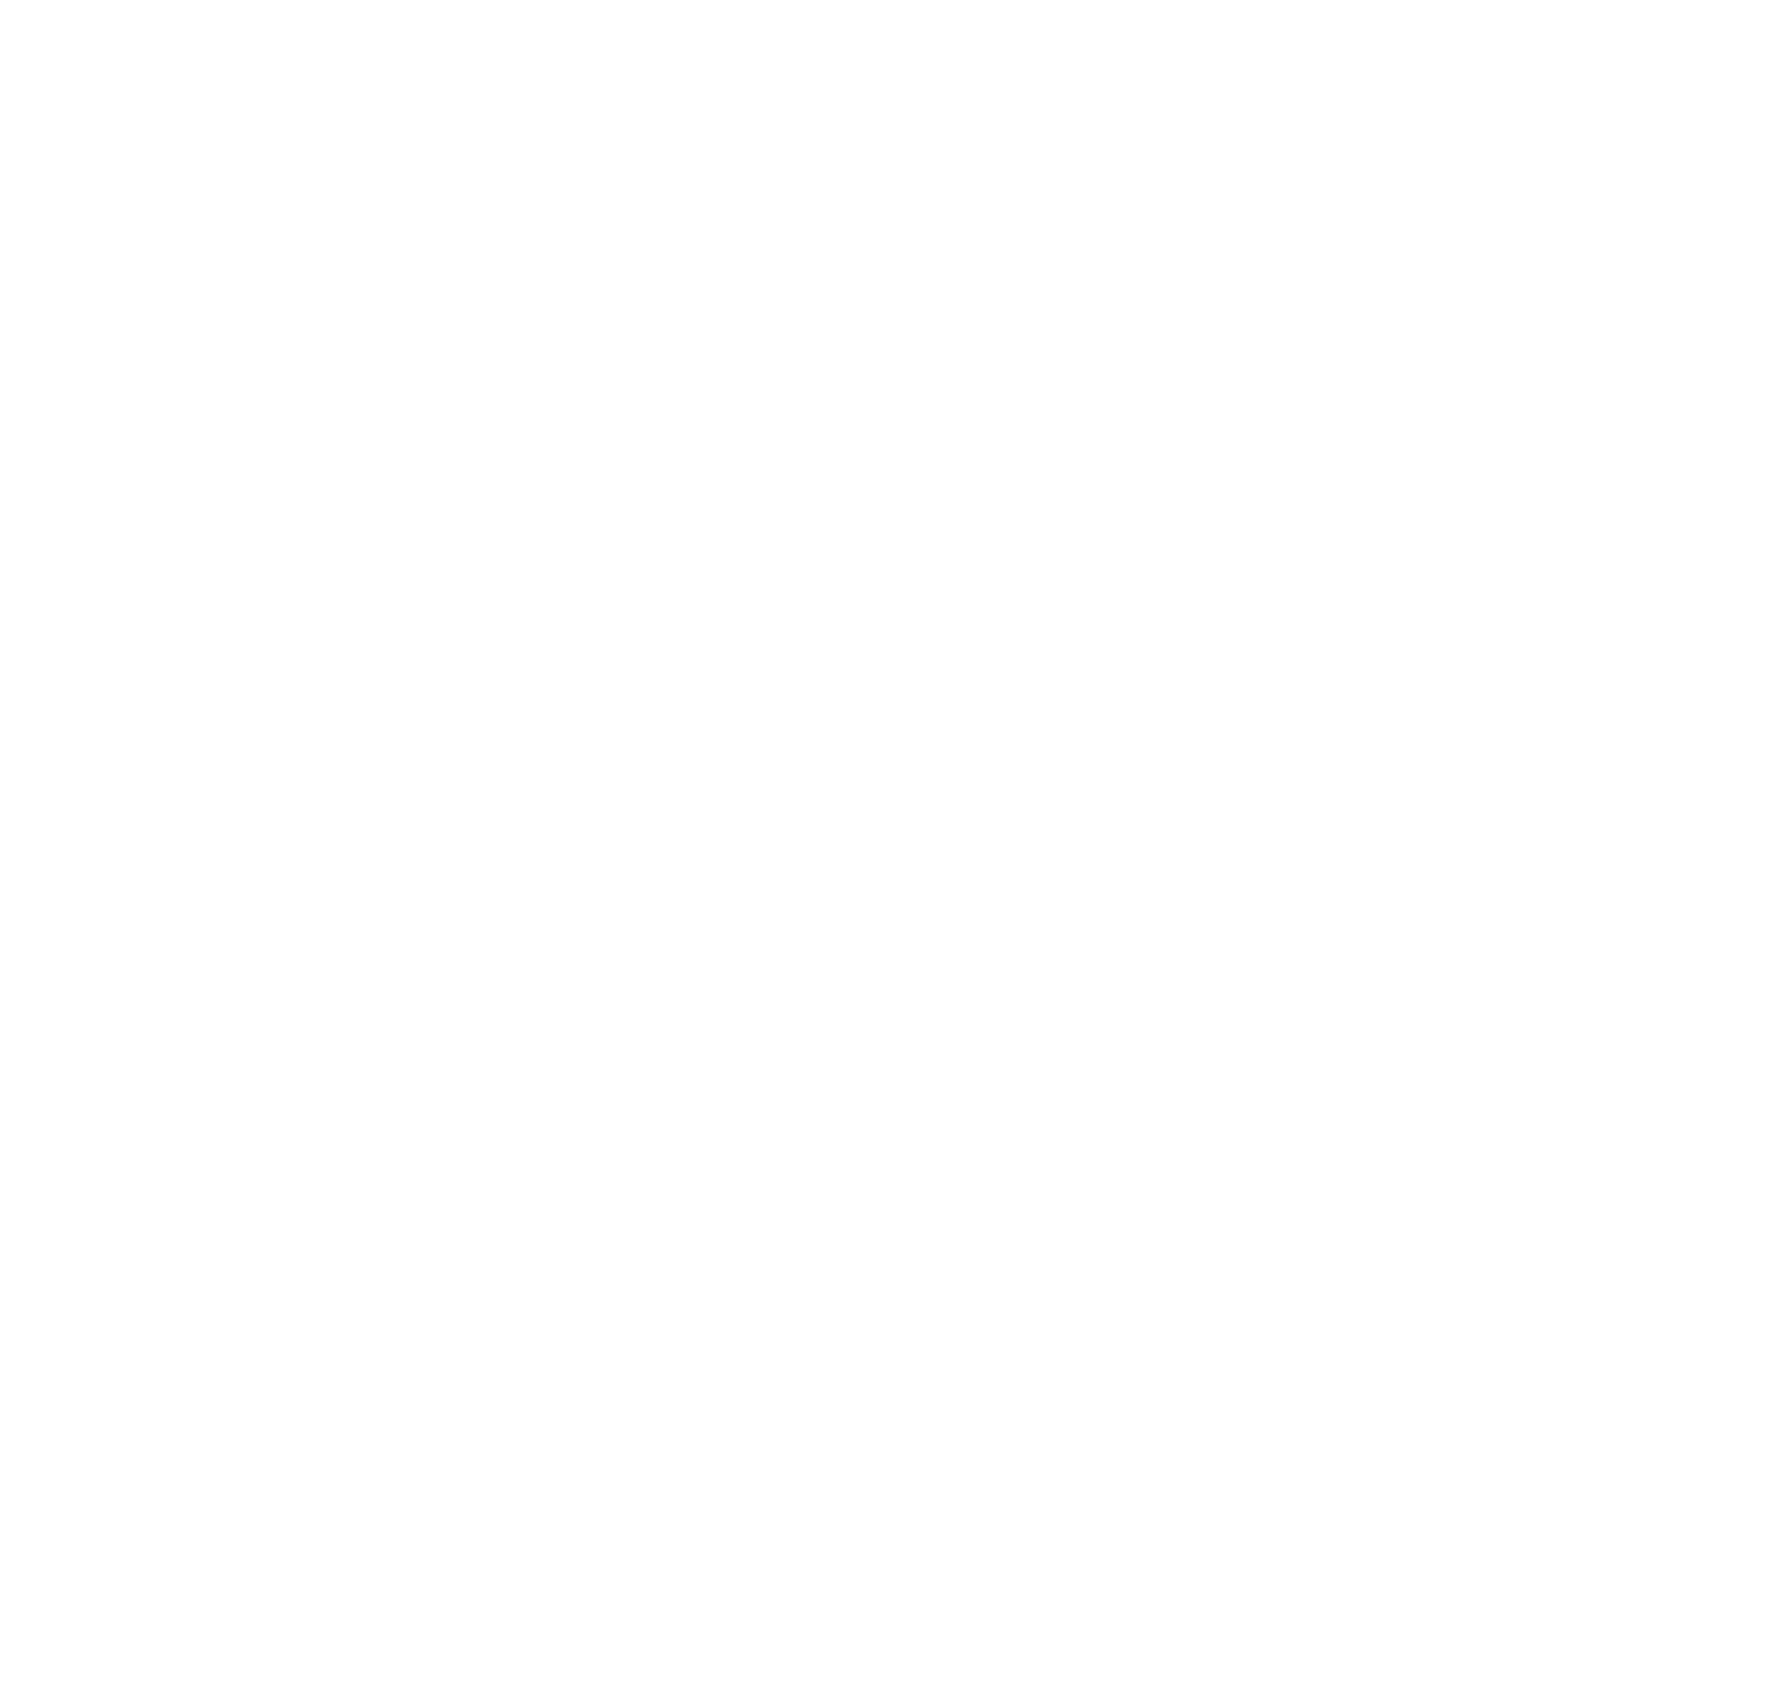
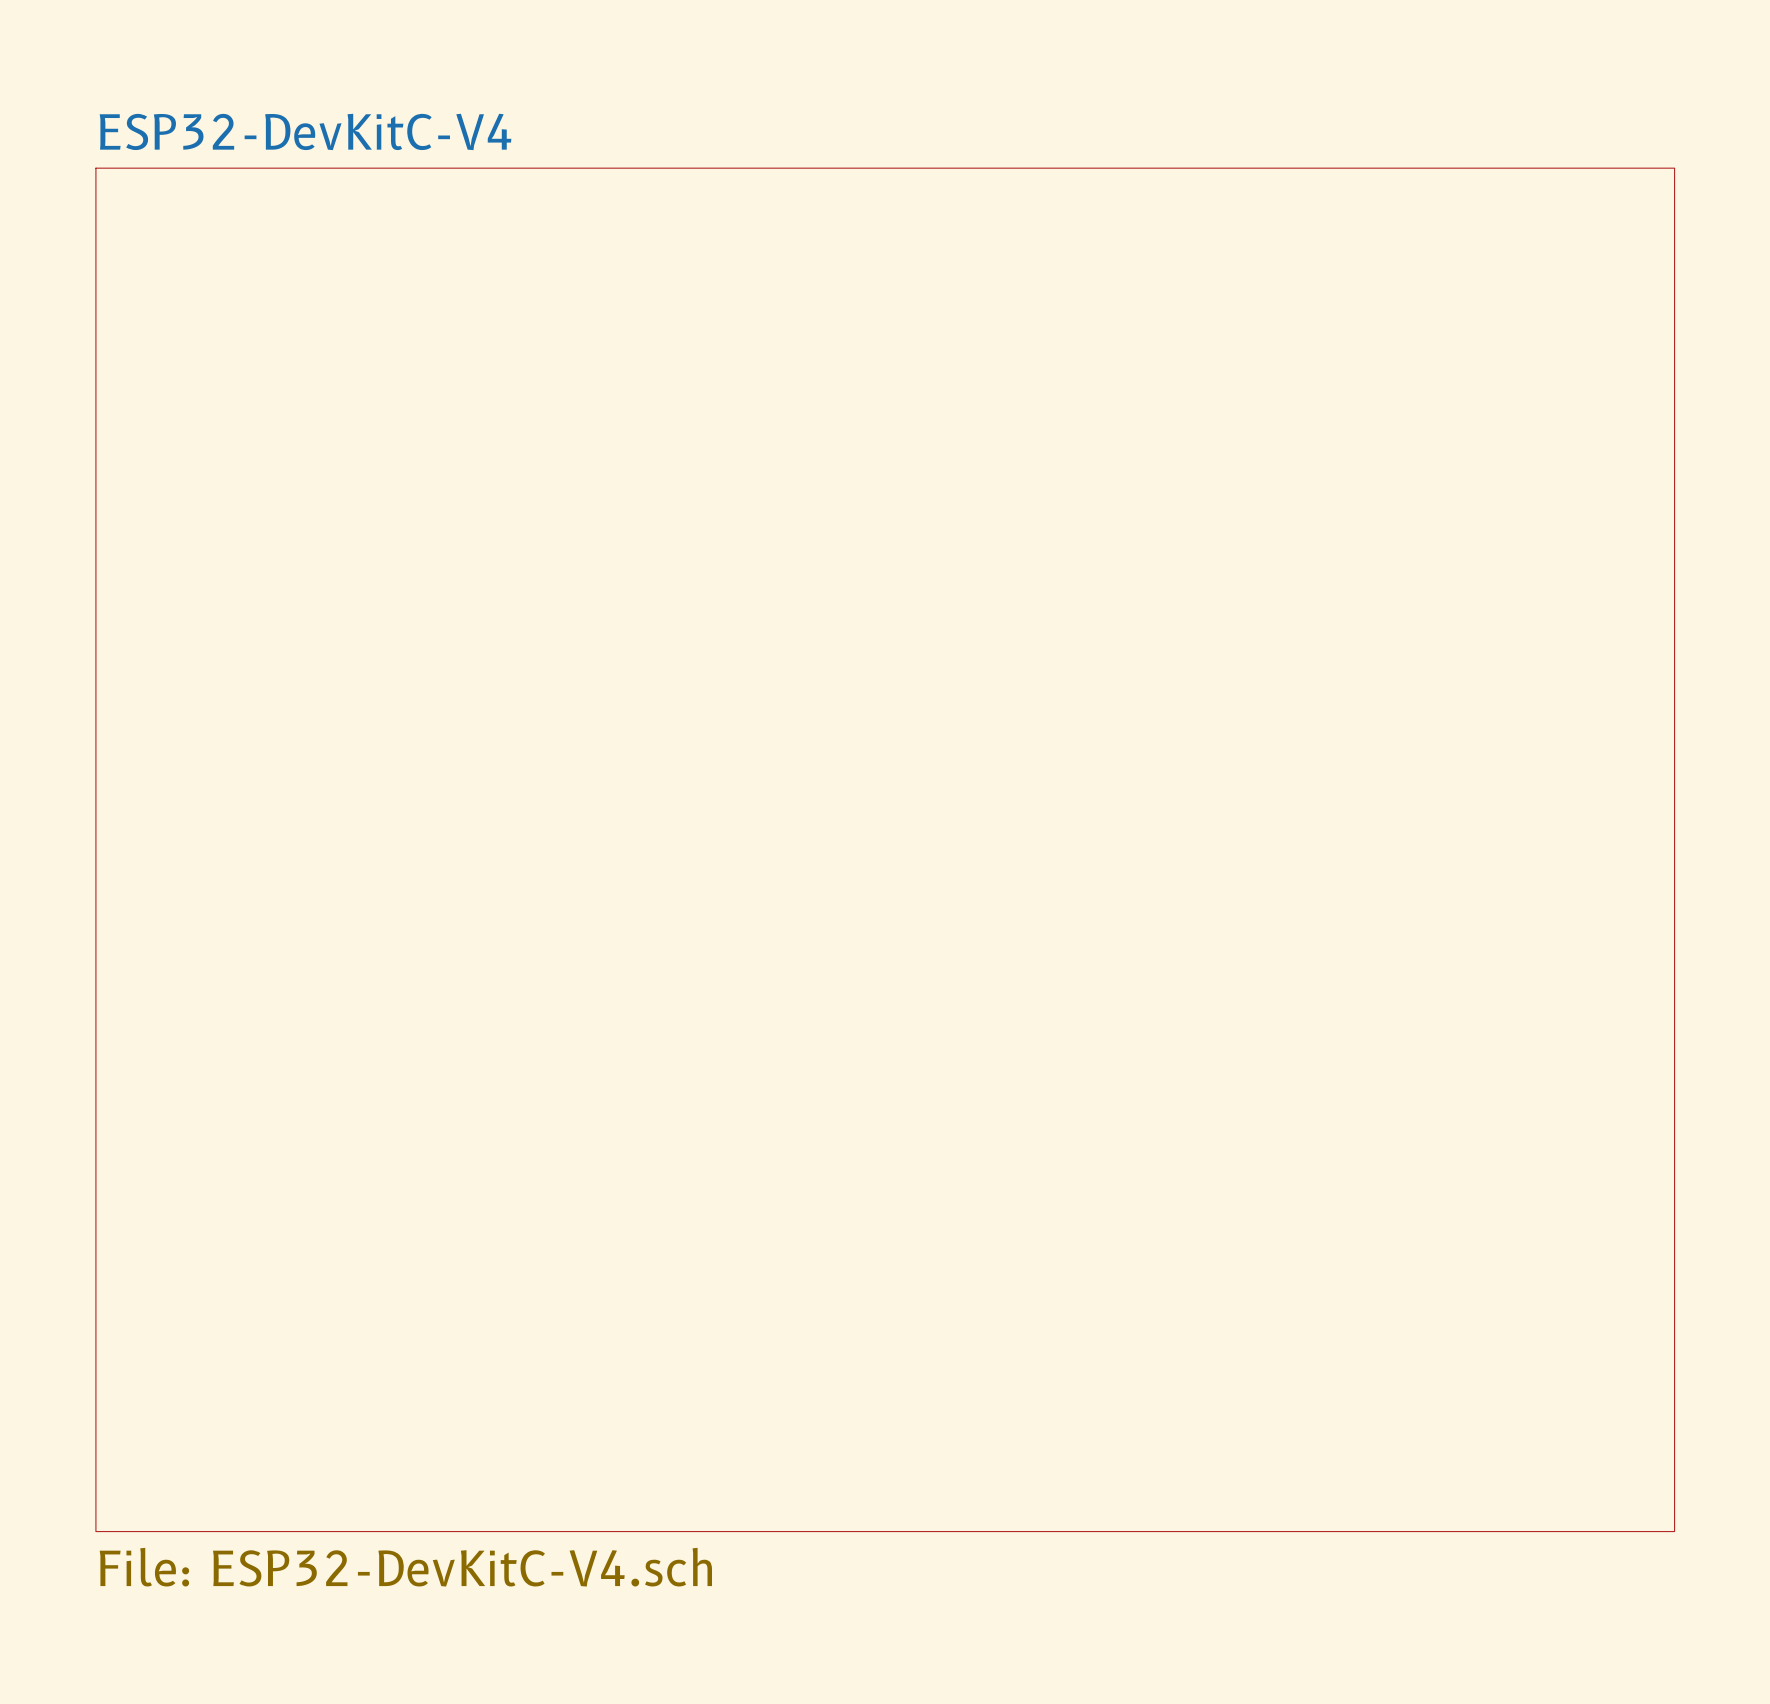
sheet ESP32-DevKitC-V4: none -> File: ESP32-DevKitC-V4.sch (885, 849)

